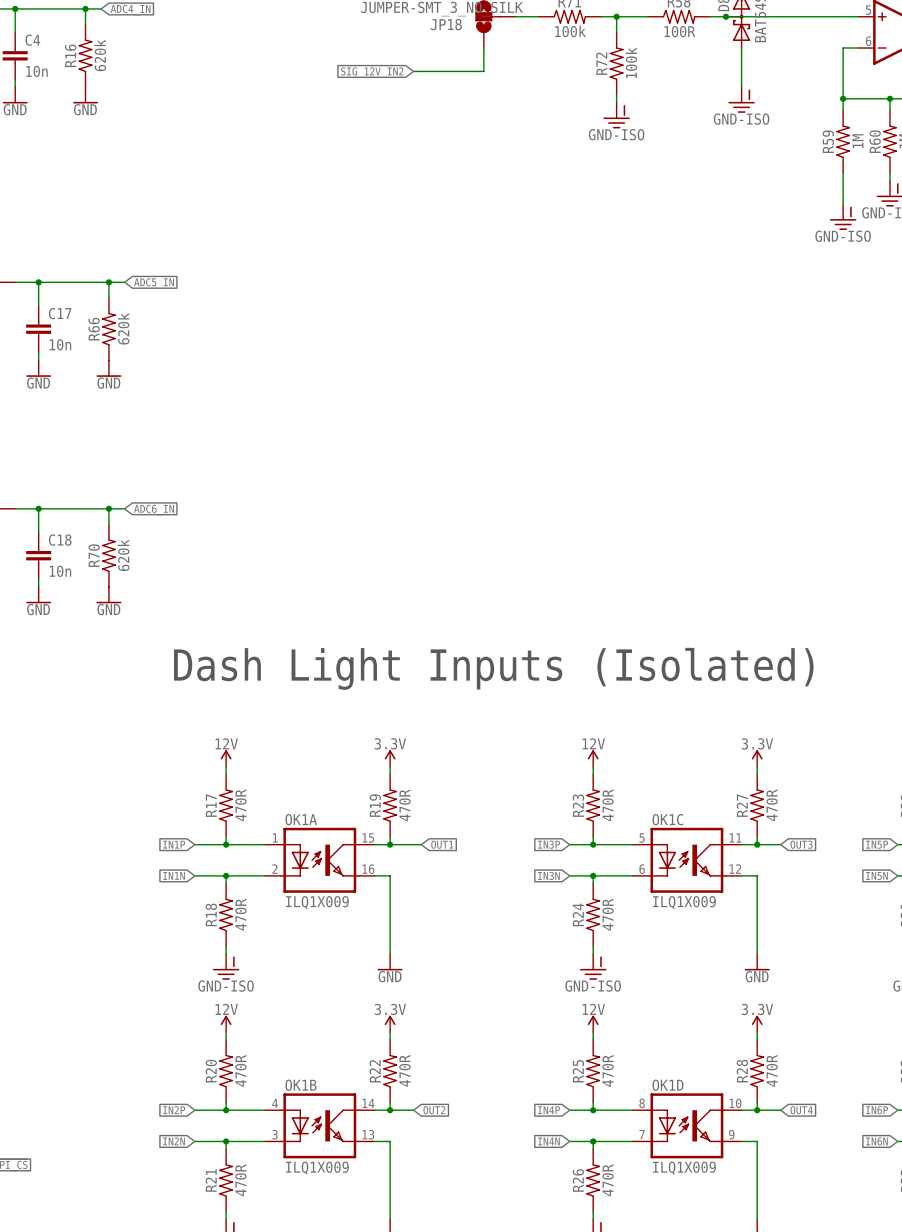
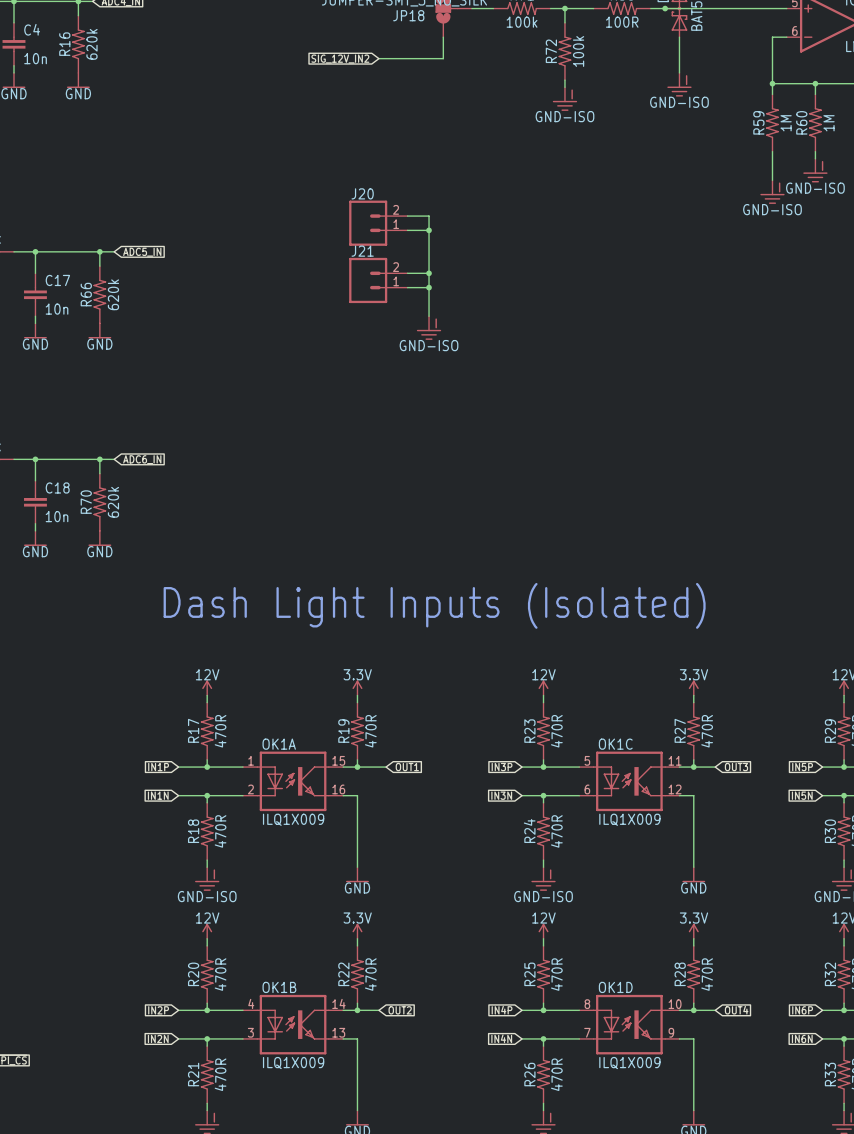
wire: none -> (407, 216) (429, 216) (429, 316)
J20: none -> (378, 223)
wire: none -> (407, 230) (429, 230)
junction: none -> (429, 230)
wire: none -> (407, 273) (429, 273)
junction: none -> (429, 273)
J21: none -> (378, 280)
wire: none -> (407, 287) (429, 287)
junction: none -> (429, 287)
power symbol: none -> GND-ISO (429, 328)

